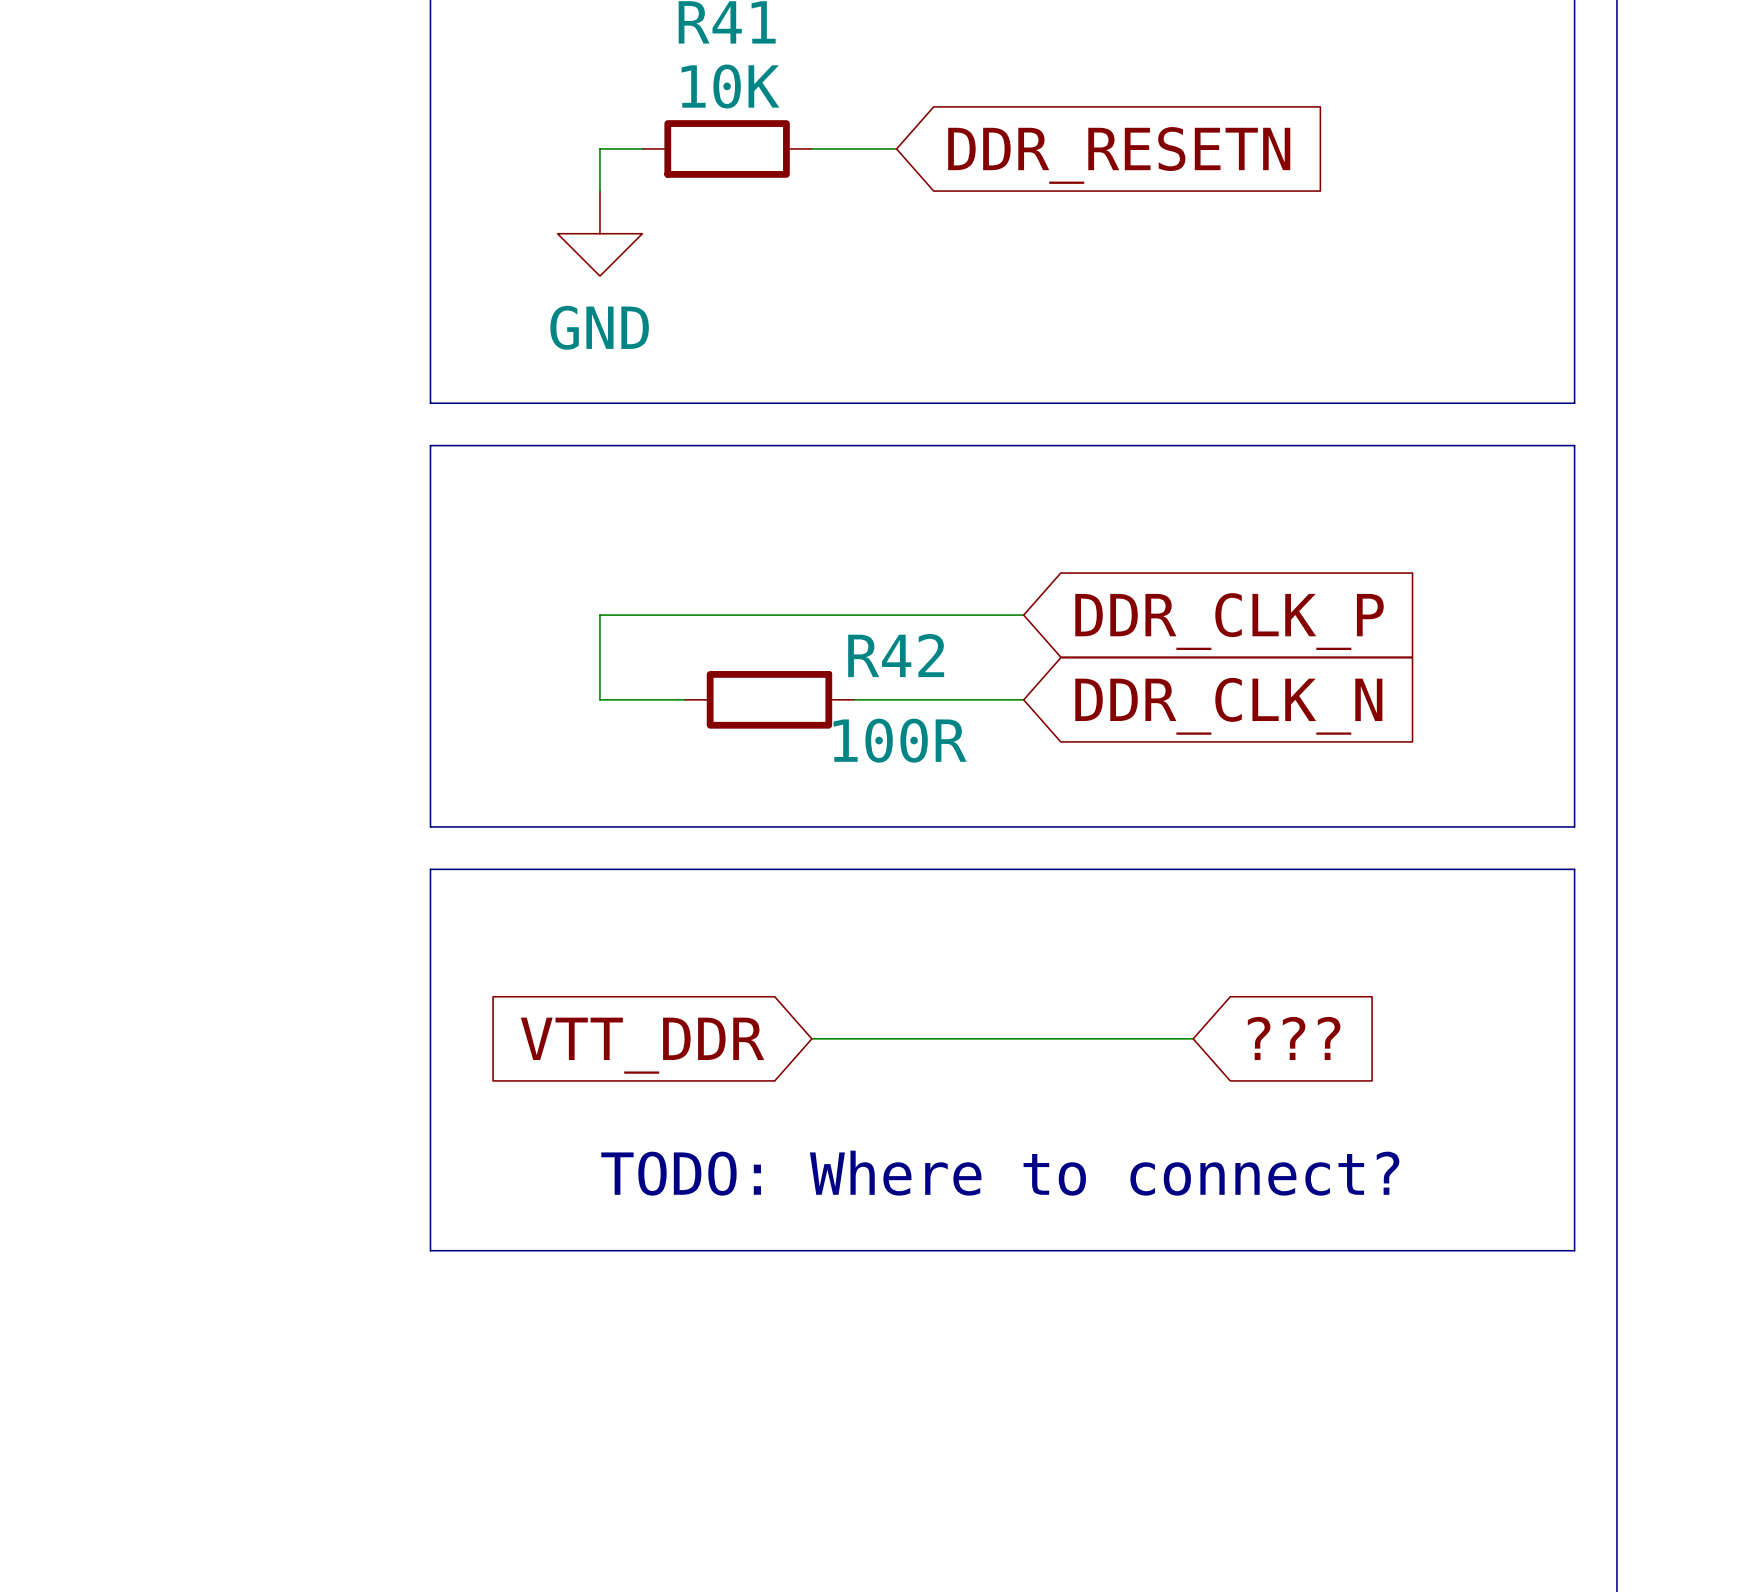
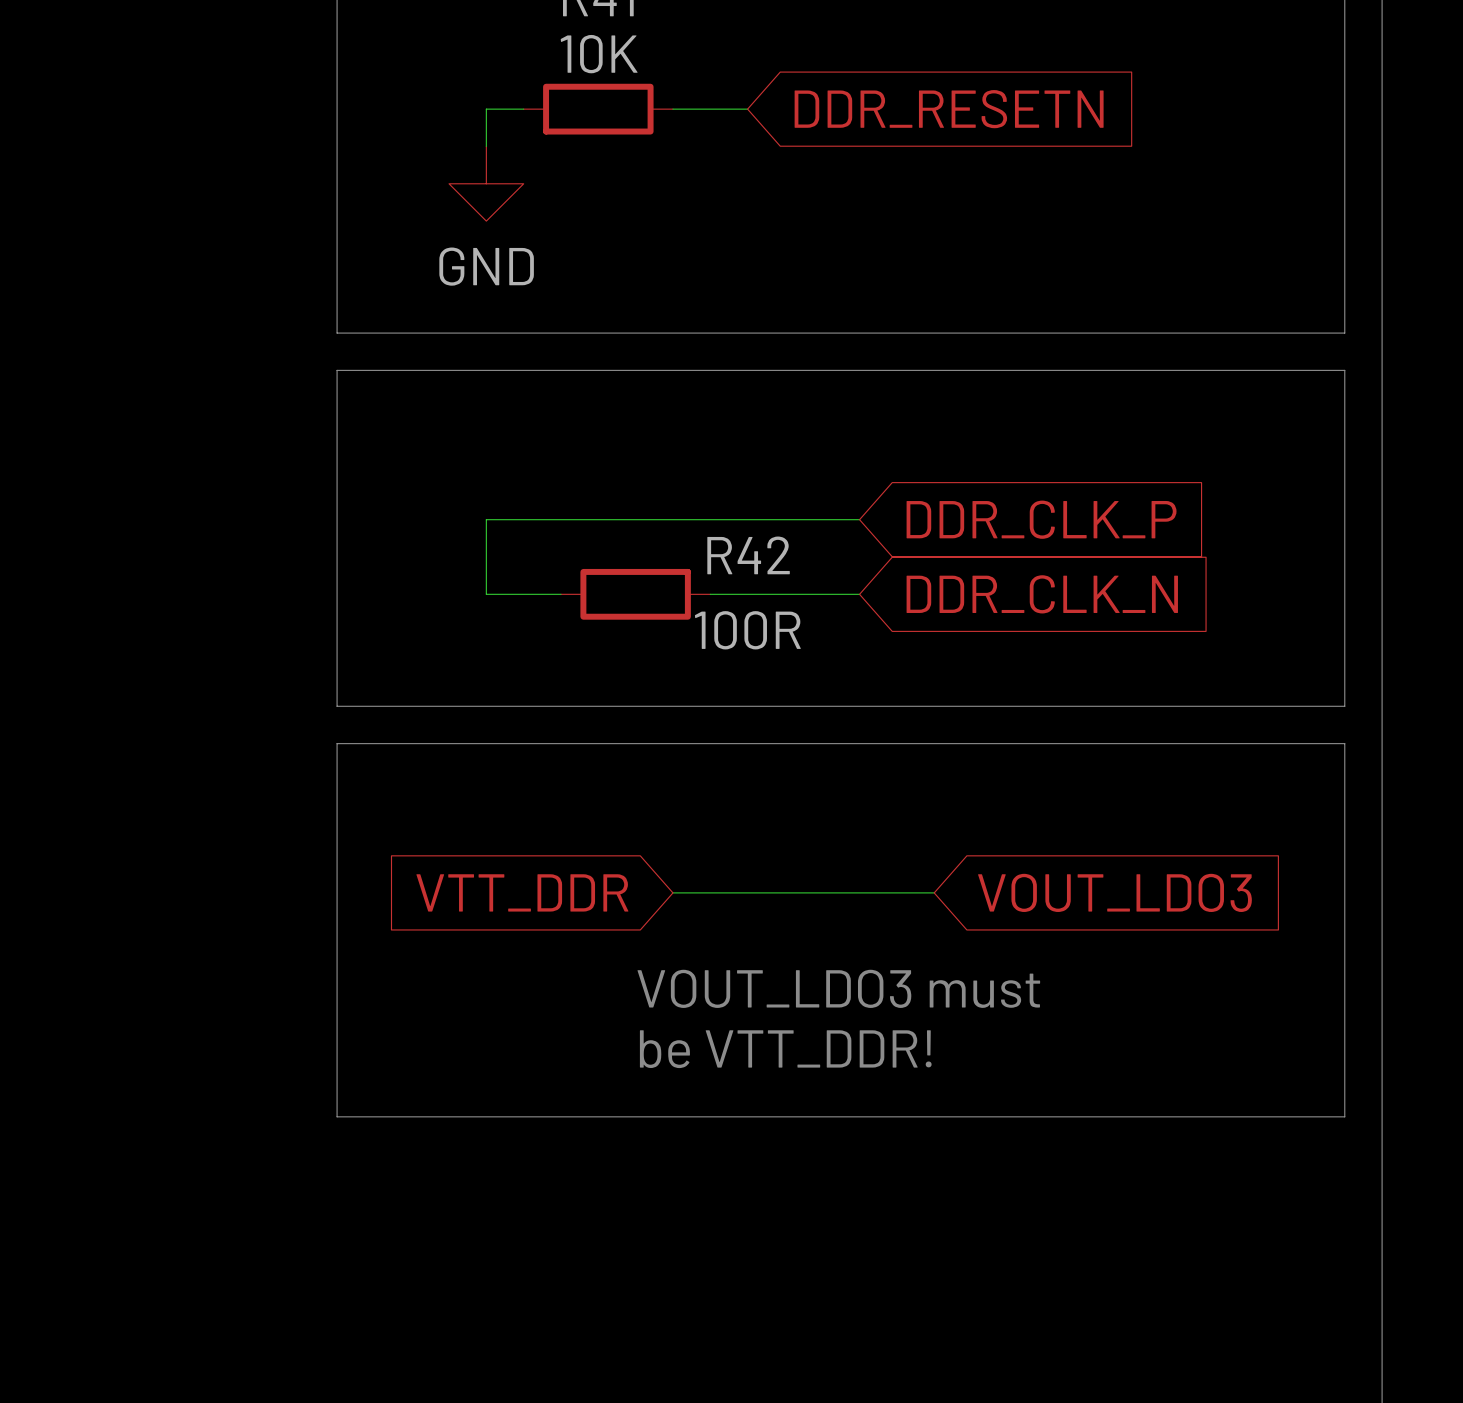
wire: (1108, 1038) (1193, 1038) -> none
global label: ??? (1294, 1038) -> none
global label: none -> VOUT_LDO3 (1114, 892)
text: none -> VOUT_LDO3 must (838, 988)
text: TODO: Where to connect? (1000, 1173) -> none
text: none -> be VTT_DDR! (785, 1049)
line: (430, 1250) (1574, 1250) -> (337, 1079) (337, 1116) (1344, 1116) (1344, 1079)

